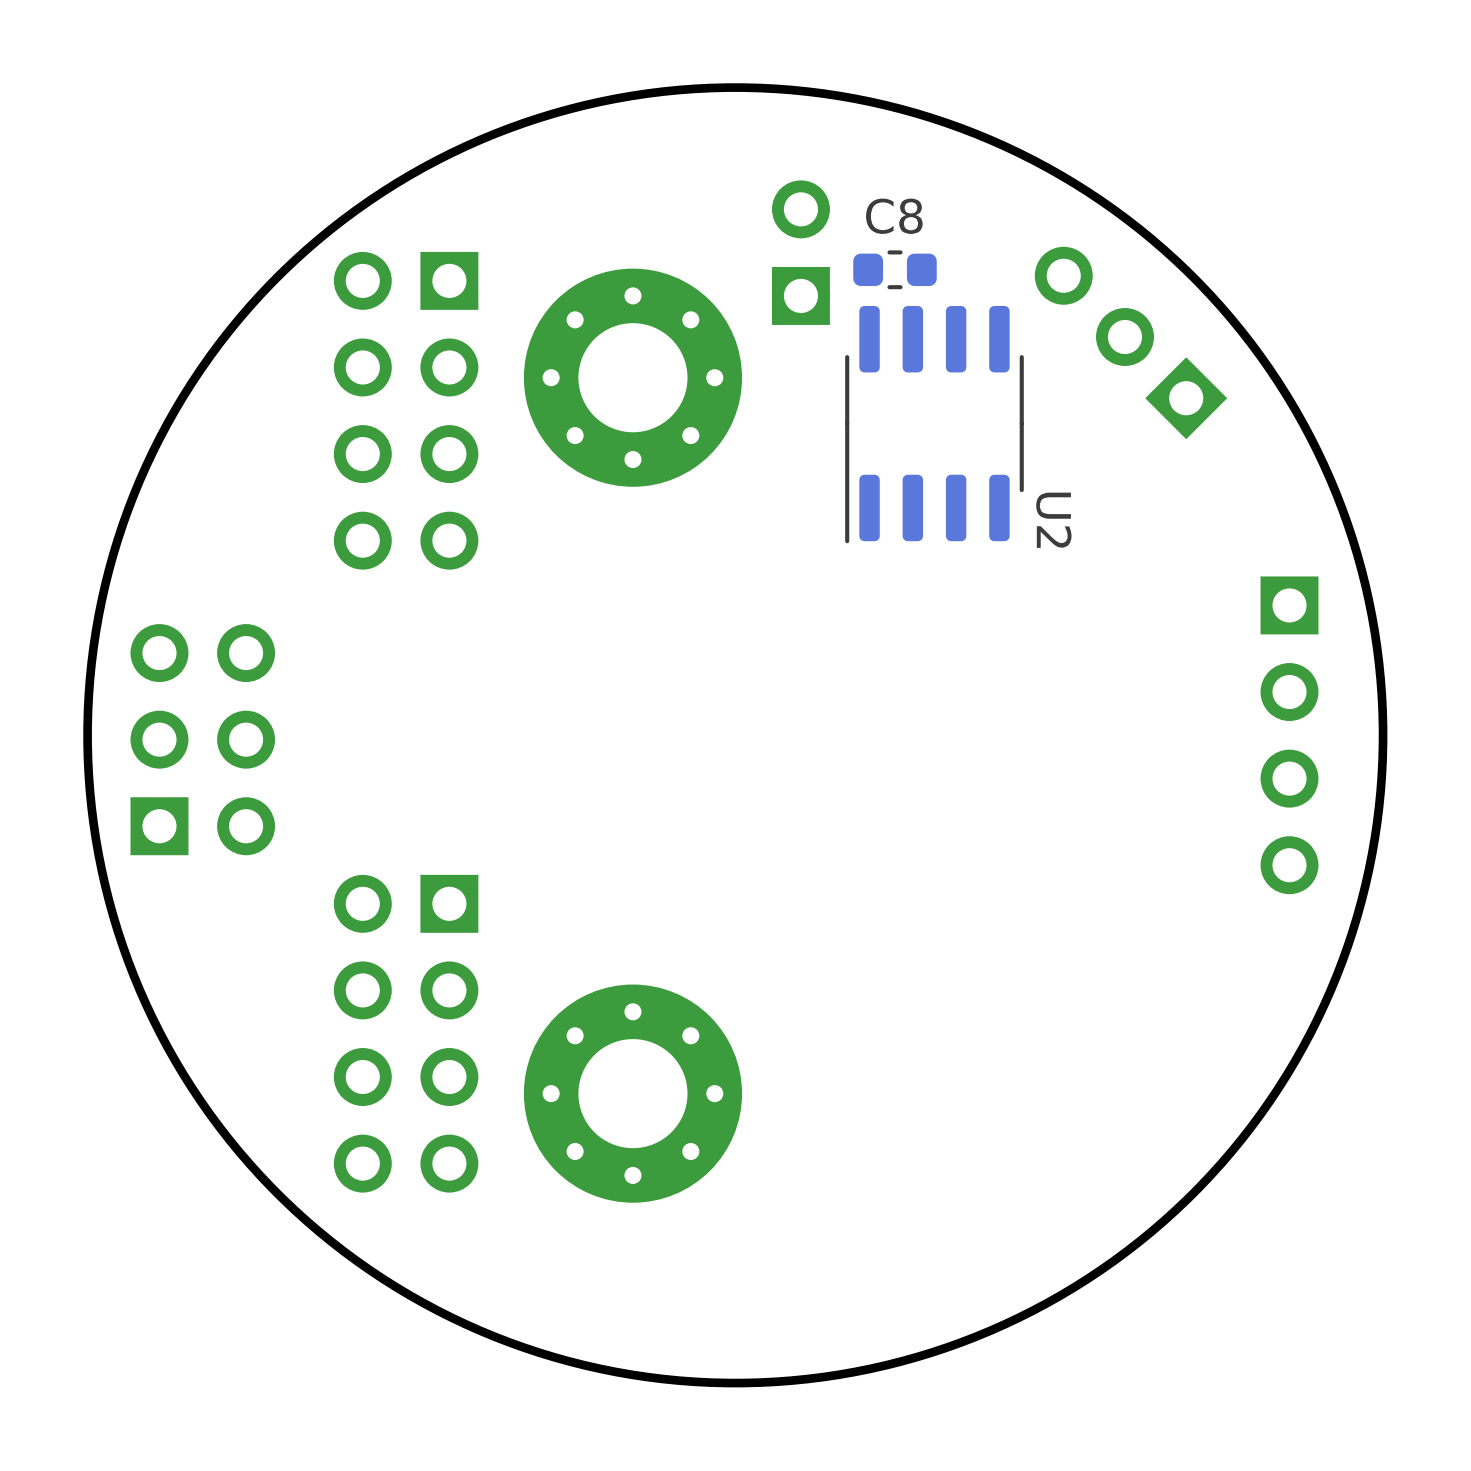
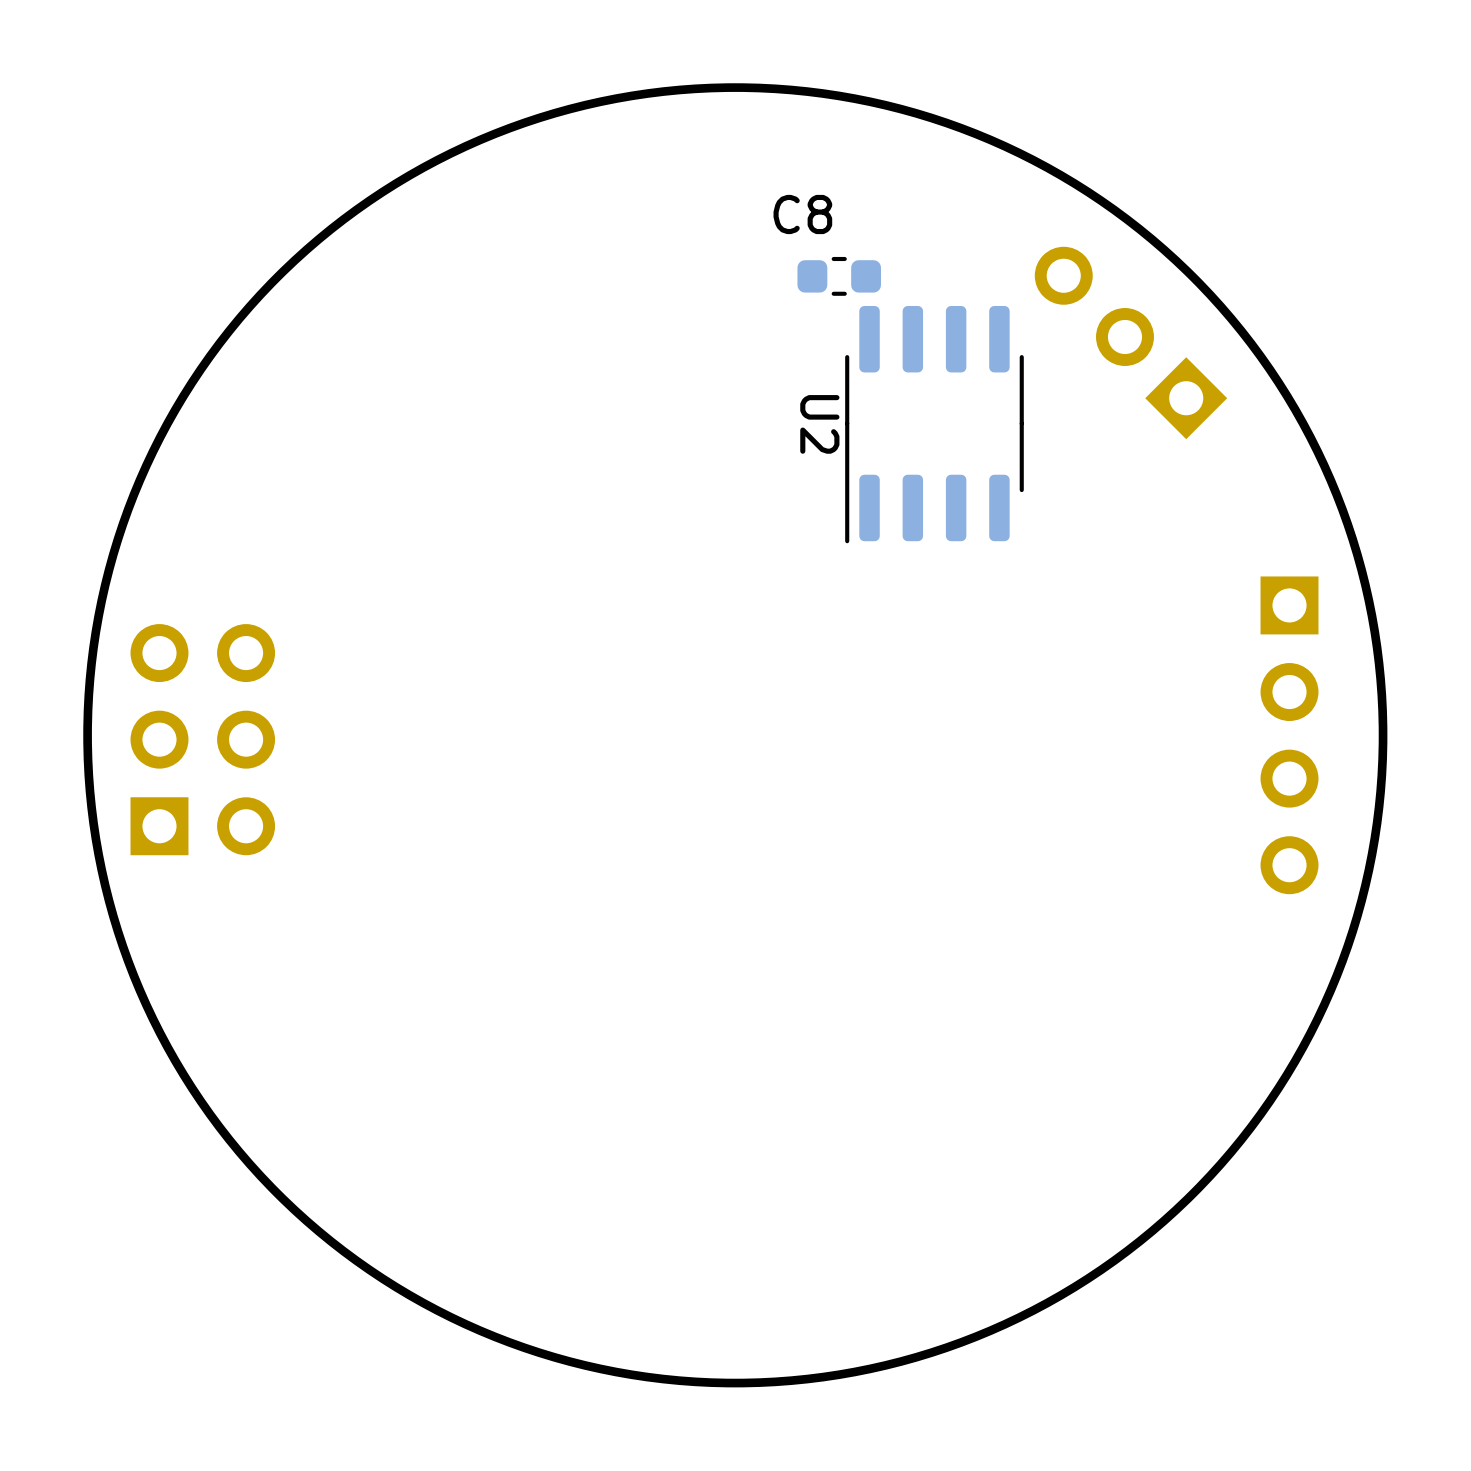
C8 name position: C8 (894, 216) -> C8 (802, 214)
part: (800, 252) -> none
C8 position: (894, 269) -> (839, 276)
part: (632, 377) -> none
part: (406, 410) -> none
U2 name position: U2 (1053, 520) -> U2 (819, 424)
part: (406, 1033) -> none
part: (632, 1093) -> none

